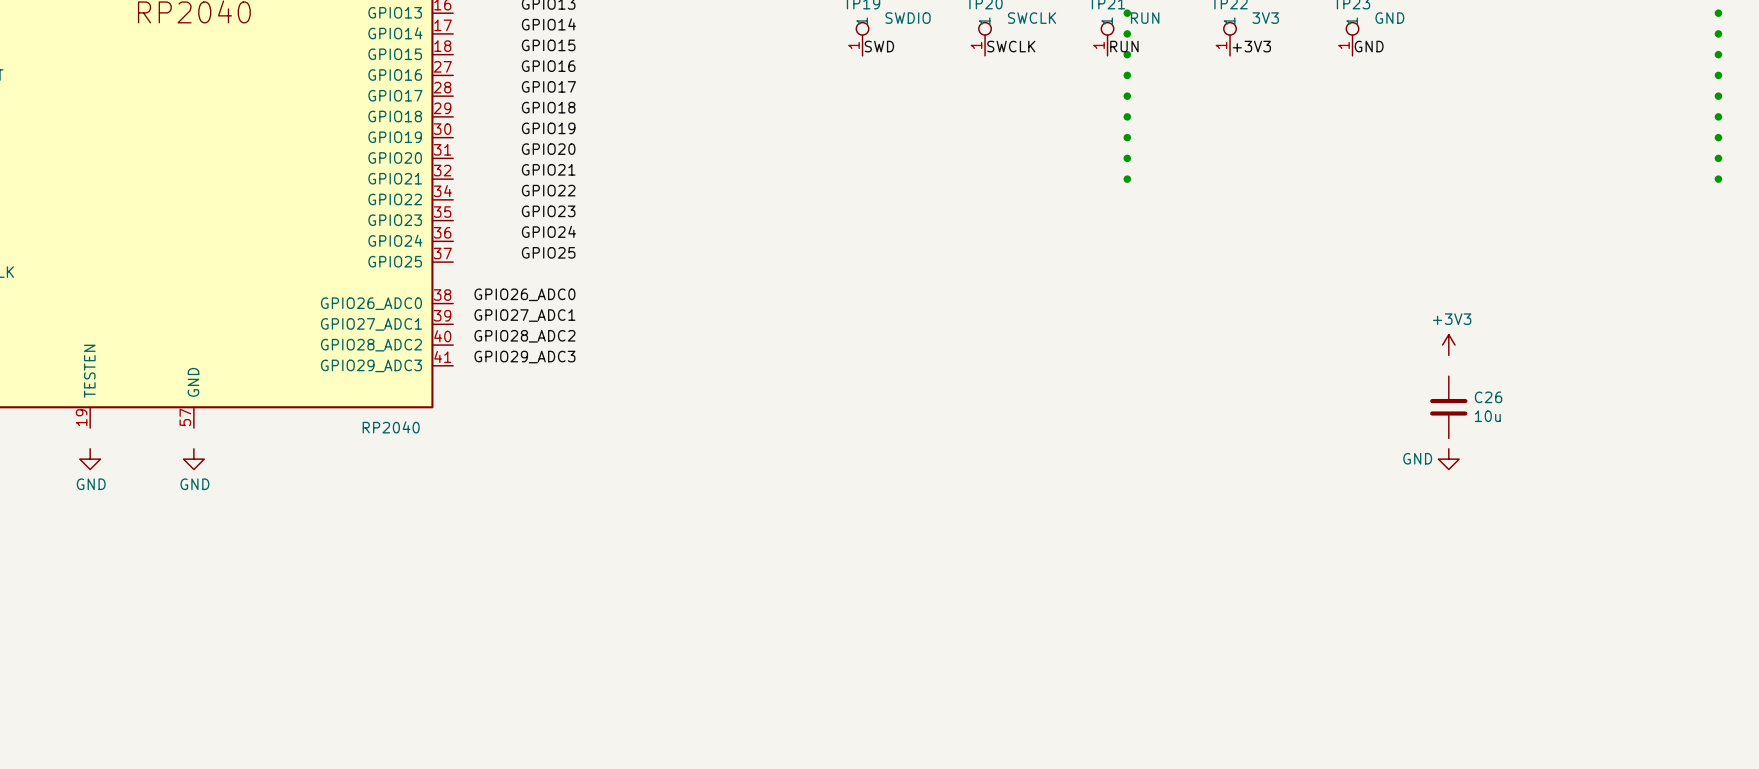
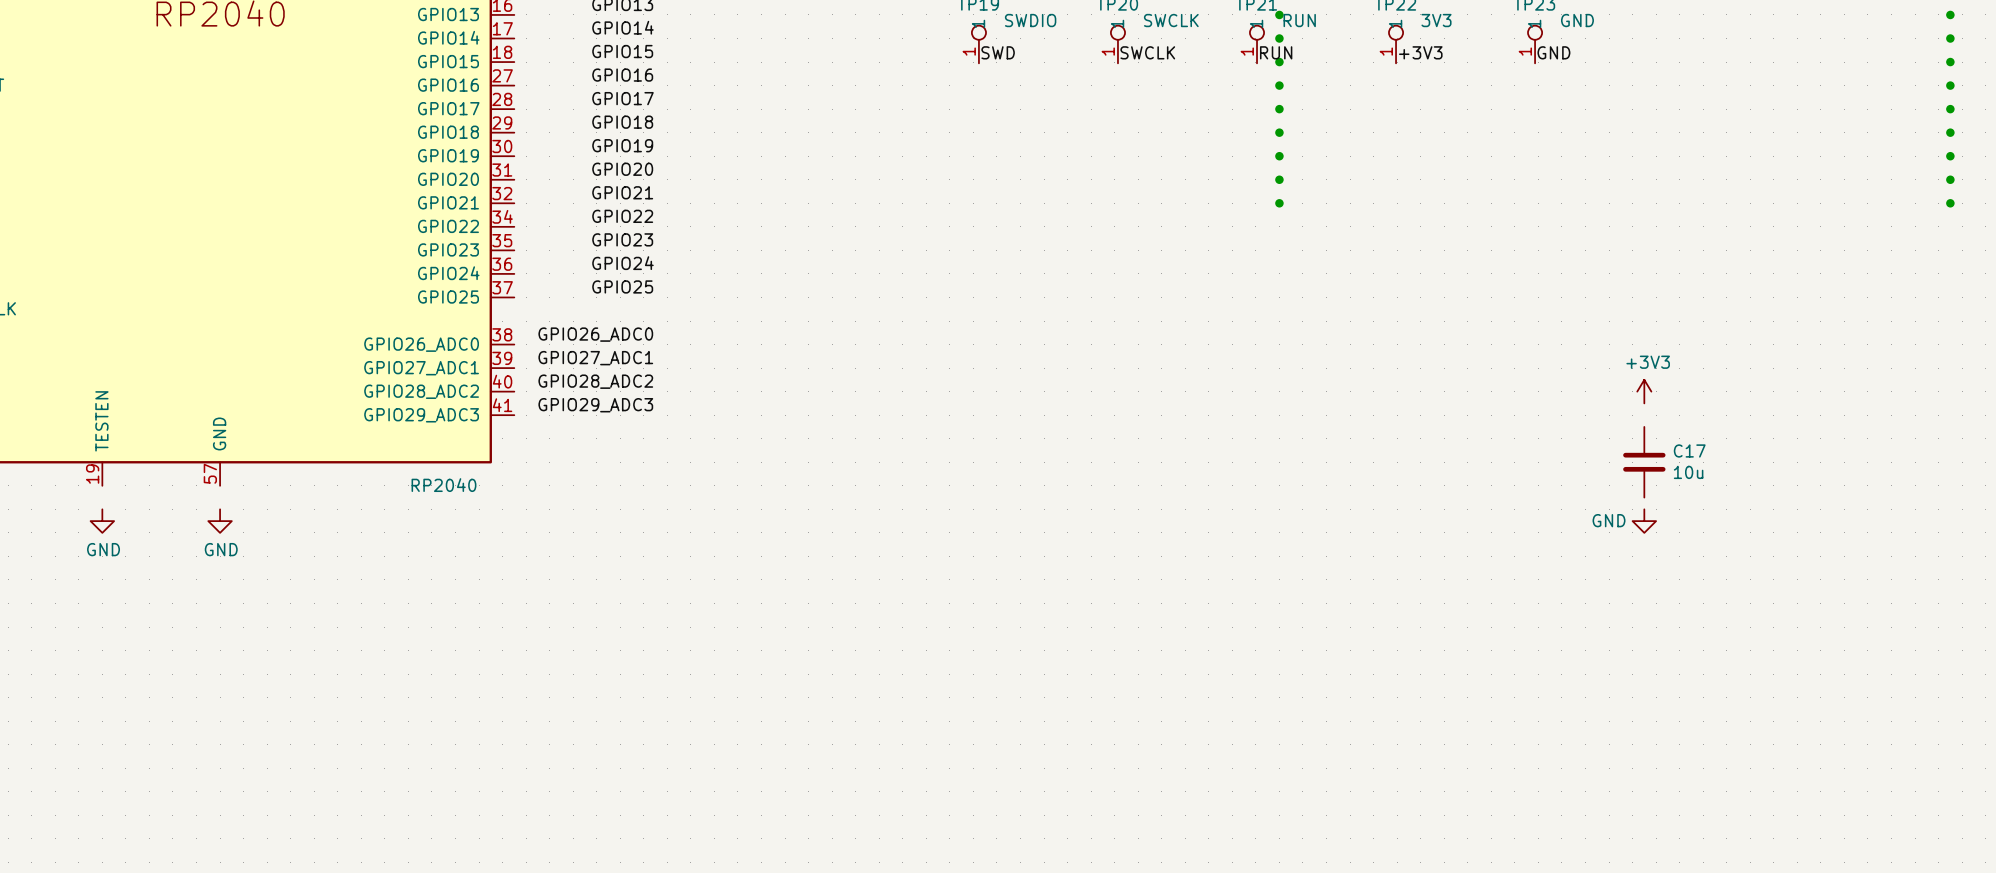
C26 name: C26 (1488, 397) -> C17 (1689, 450)

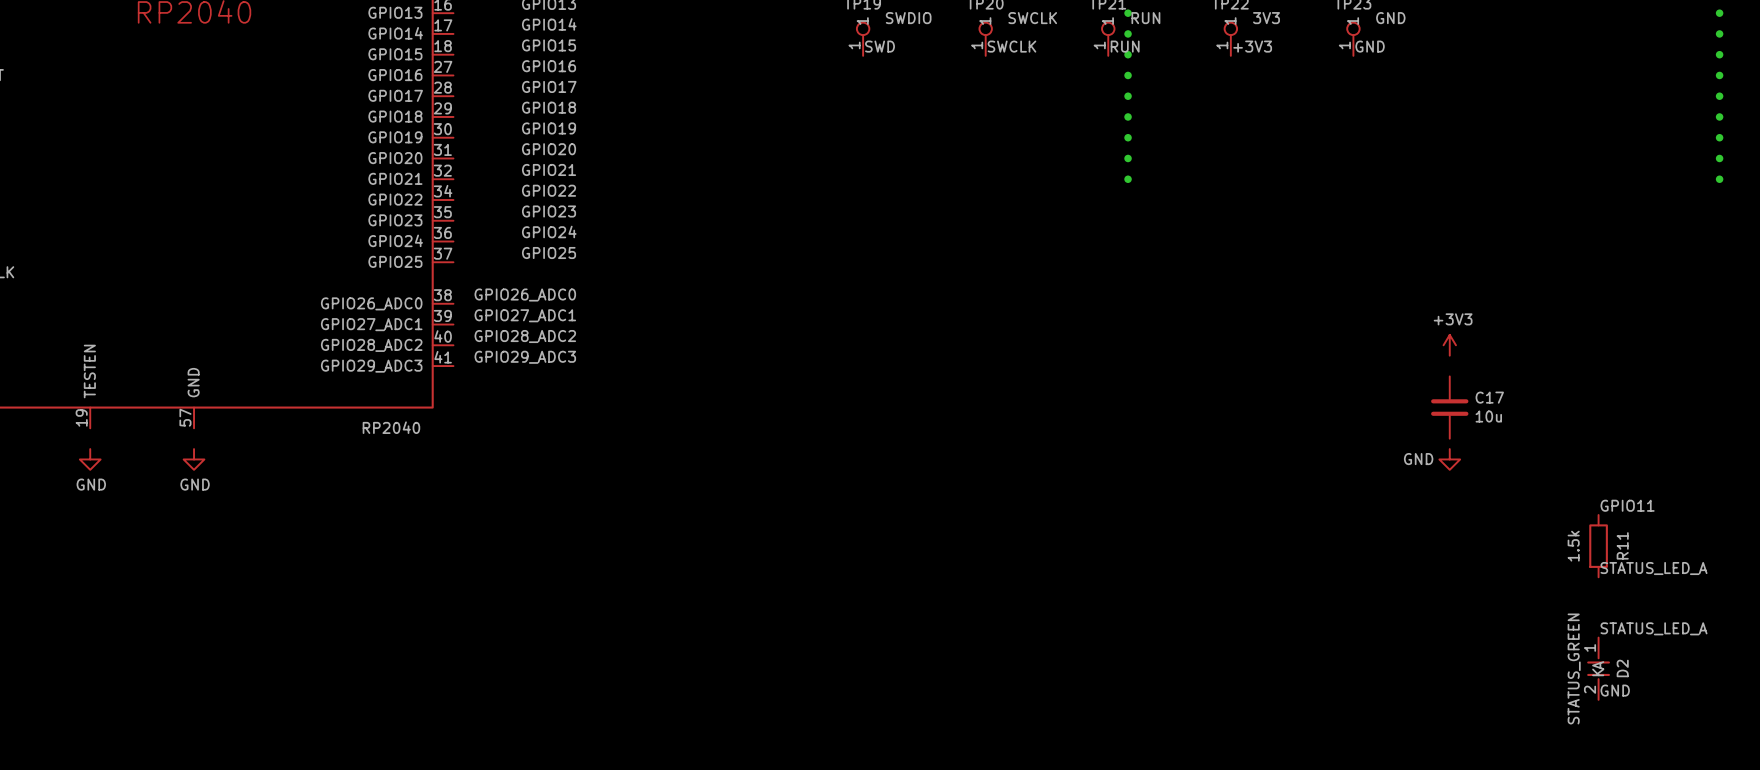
label: none -> GPIO11 (1627, 505)
R11: none -> 1.5k (1598, 546)
label: none -> STATUS_LED_A (1654, 568)
label: none -> STATUS_LED_A (1654, 628)
D2: none -> STATUS_GREEN (1598, 668)
label: none -> GND (1615, 690)

